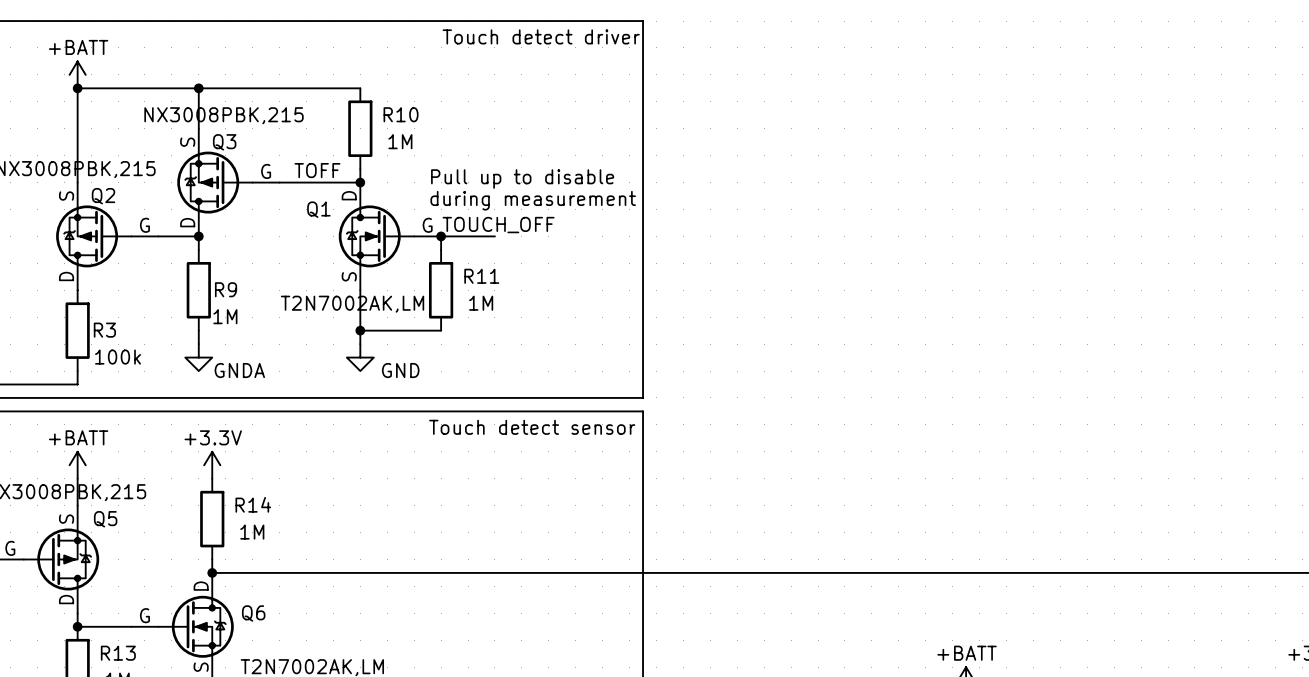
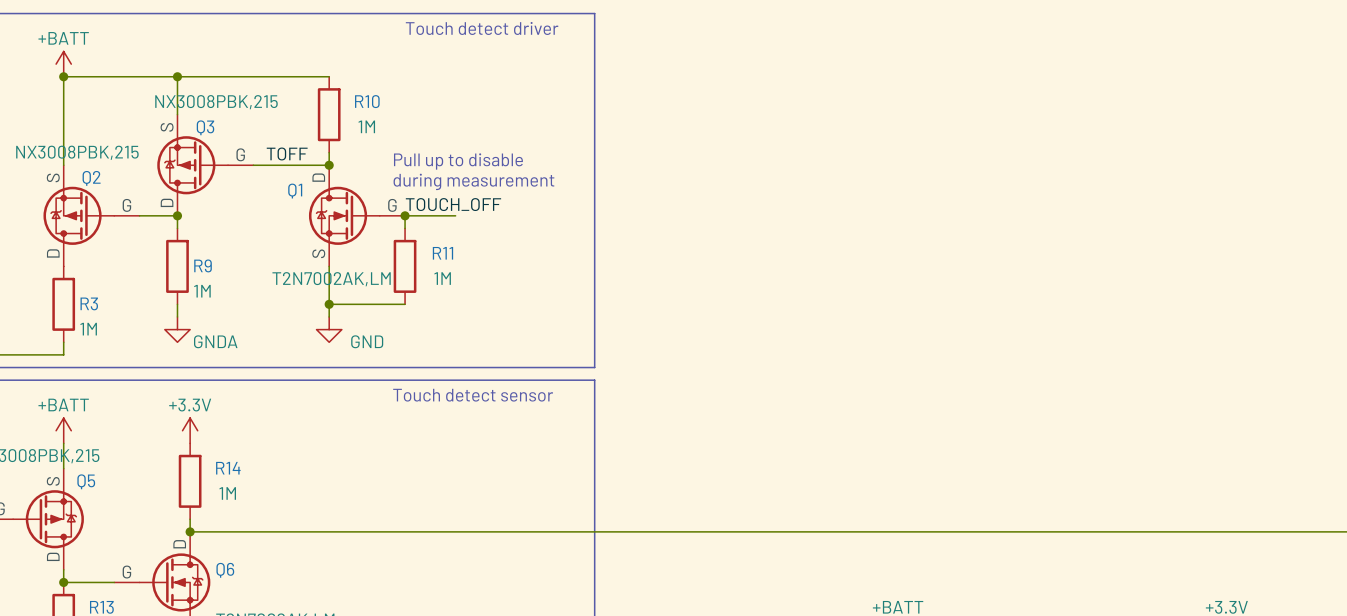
R3 value: 100k (118, 357) -> 1M (88, 329)

